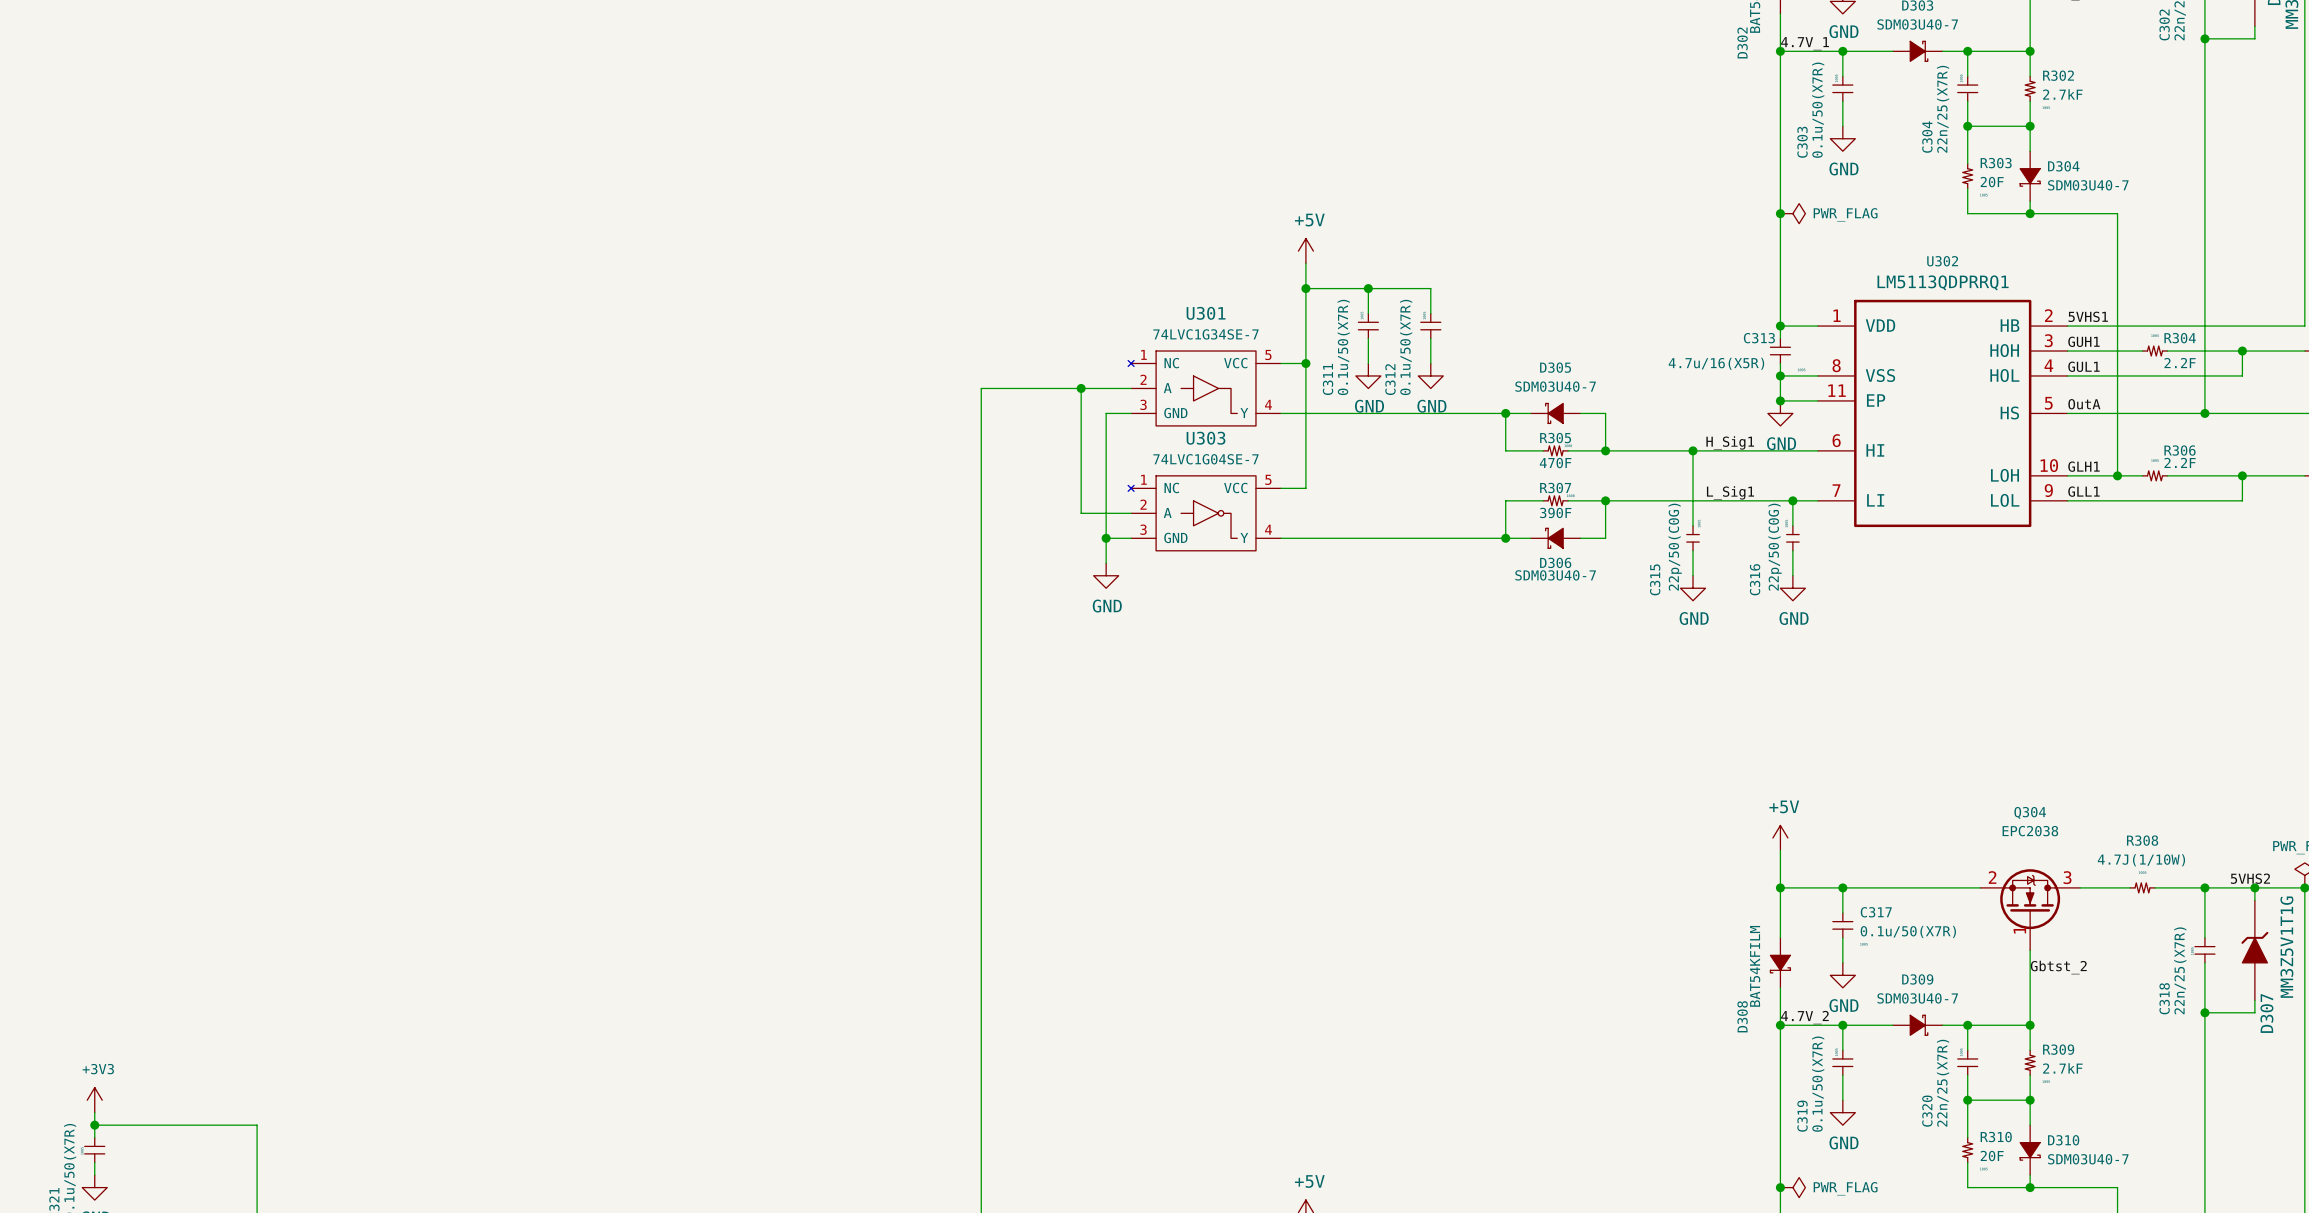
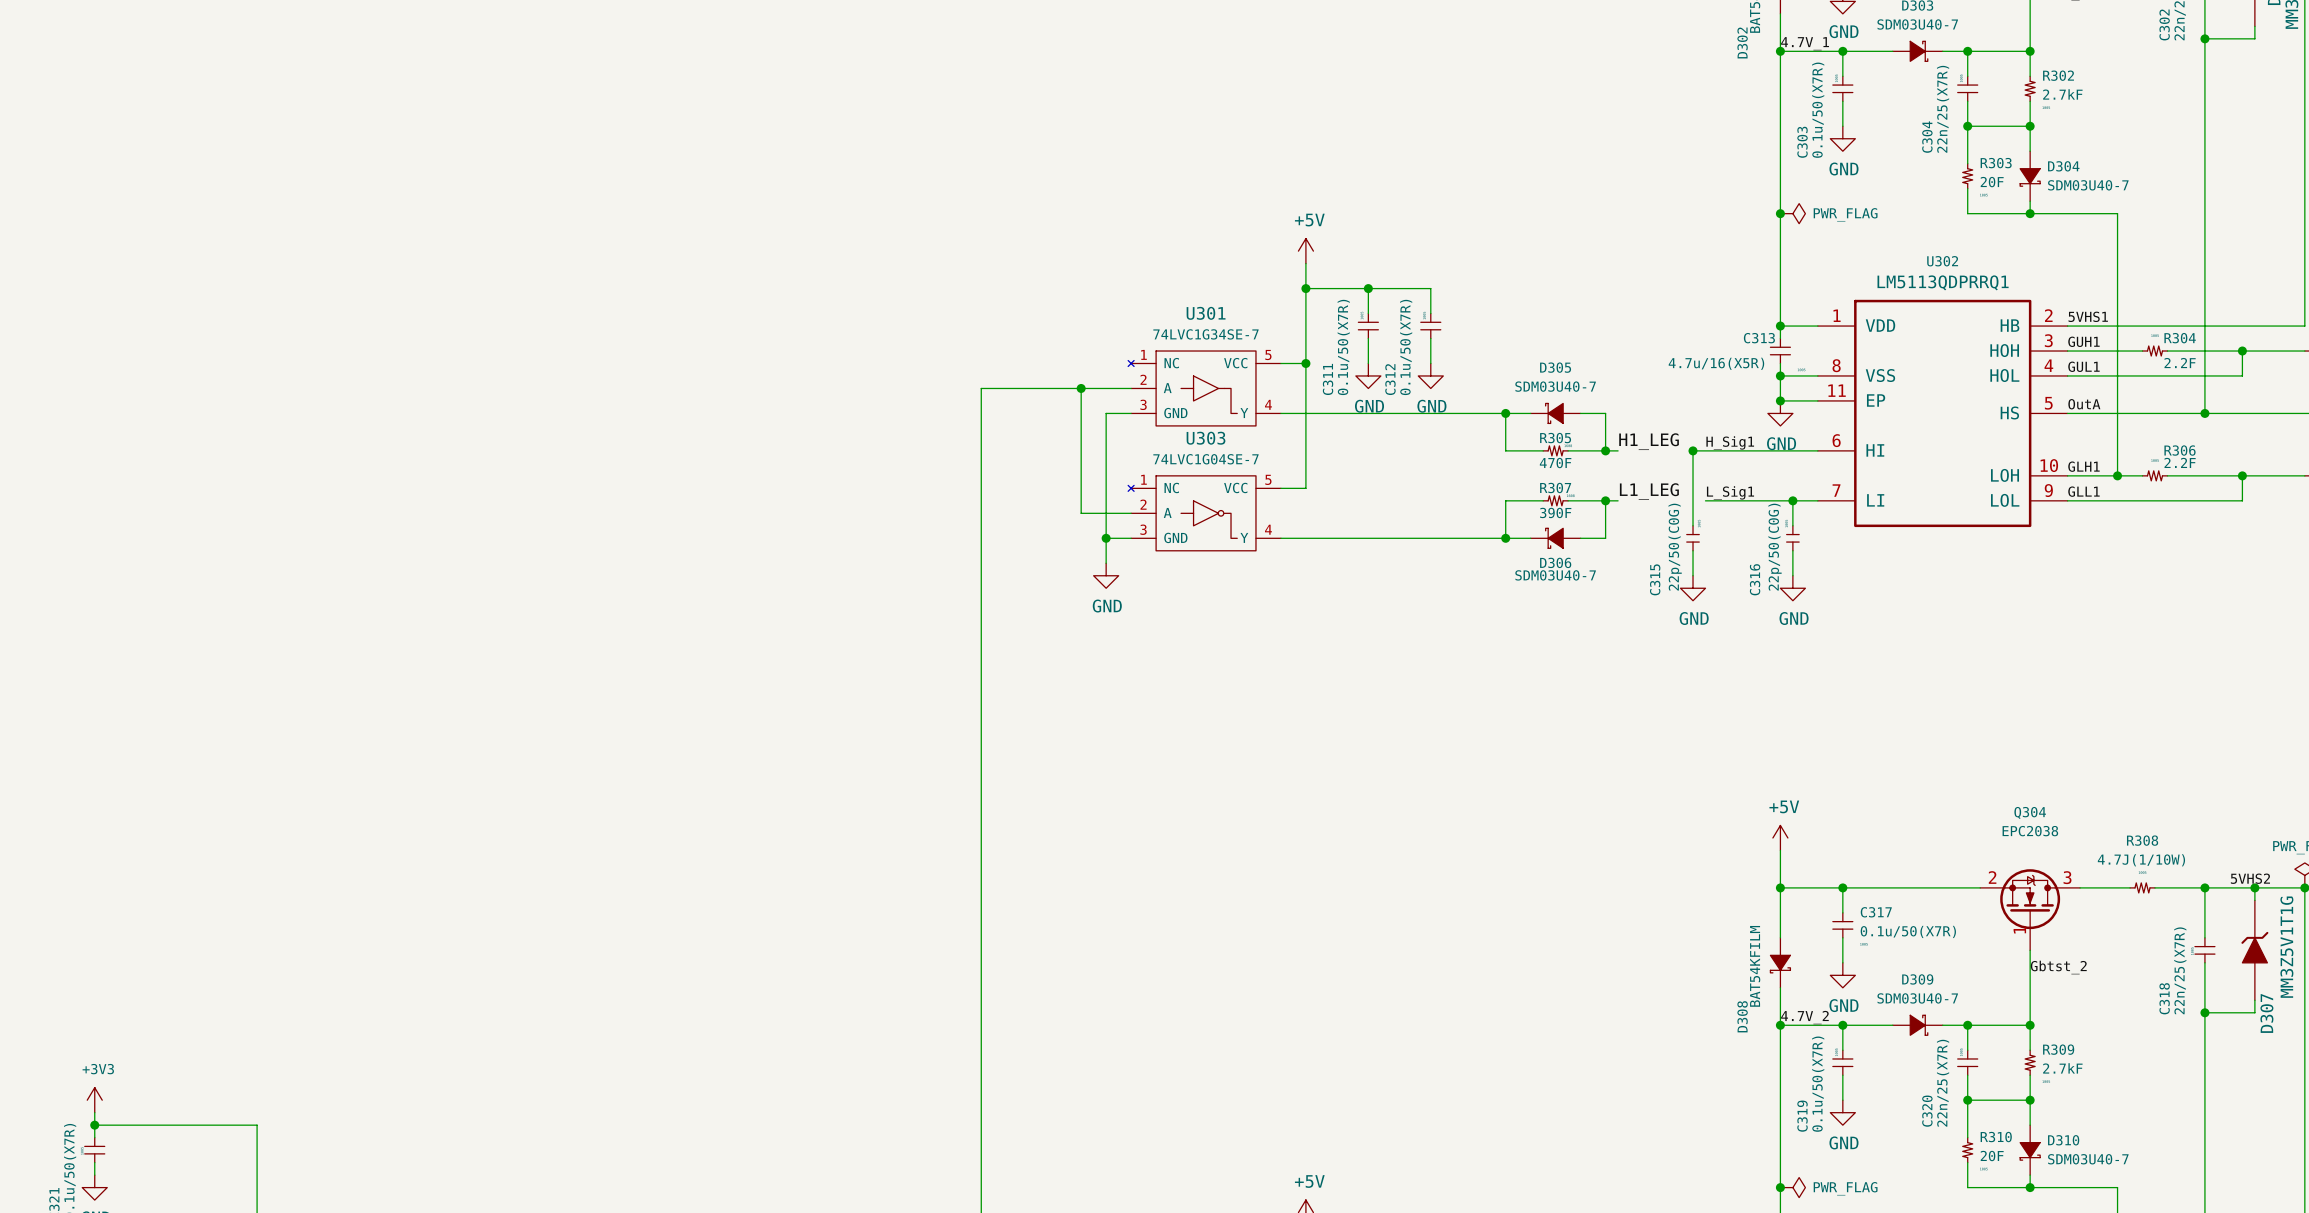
label: none -> H1_LEG (1649, 441)
wire: (1618, 450) (1693, 450) -> none
label: none -> L1_LEG (1649, 491)
wire: (1618, 500) (1705, 500) -> none

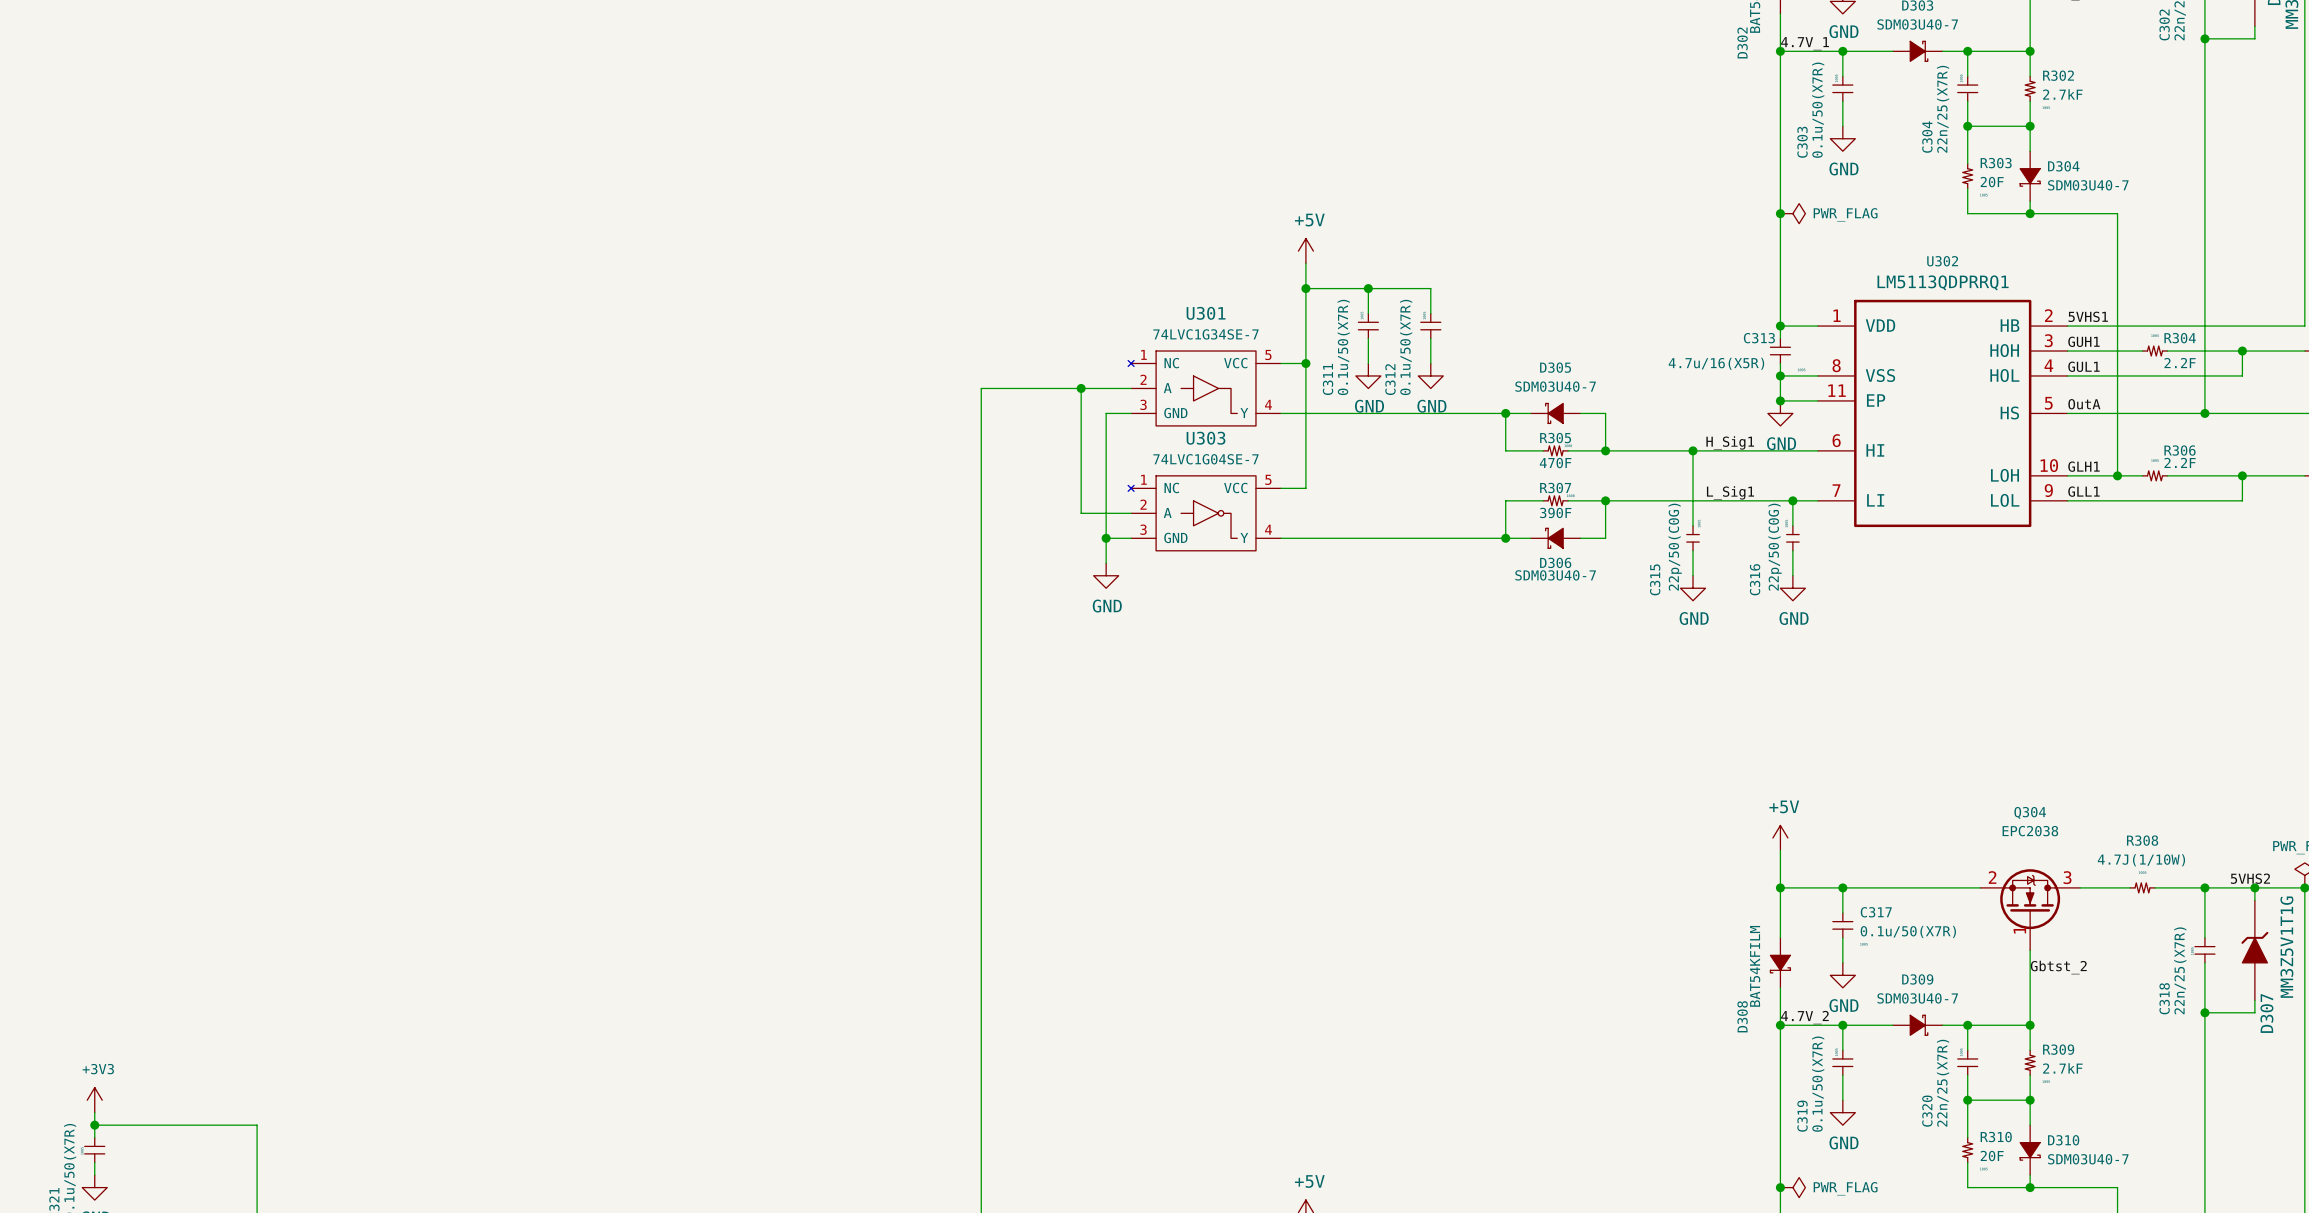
label: H1_LEG (1649, 441) -> none
wire: none -> (1618, 450) (1693, 450)
label: L1_LEG (1649, 491) -> none
wire: none -> (1618, 500) (1705, 500)

